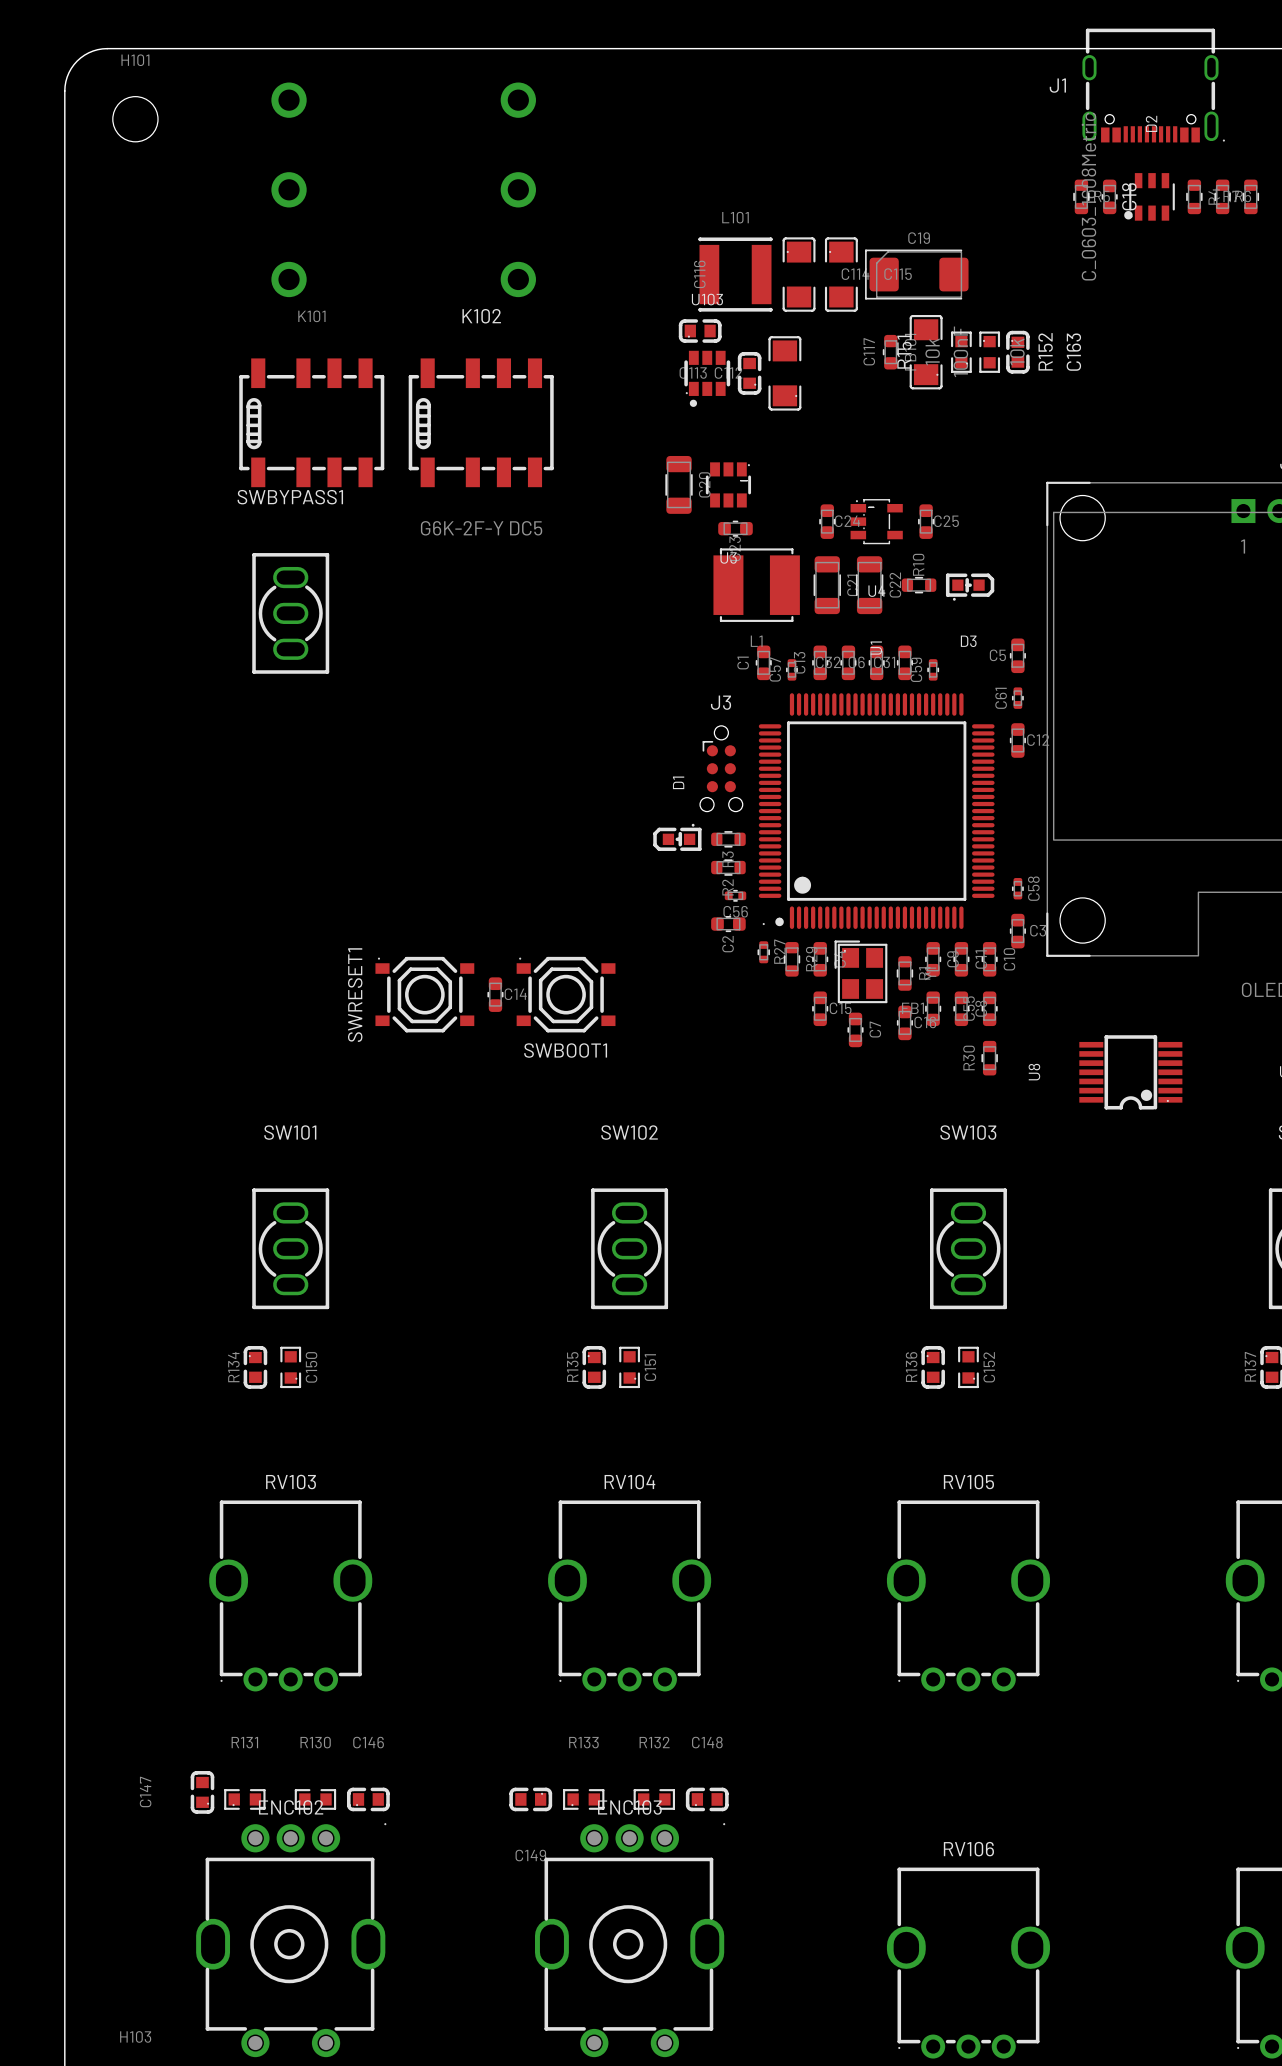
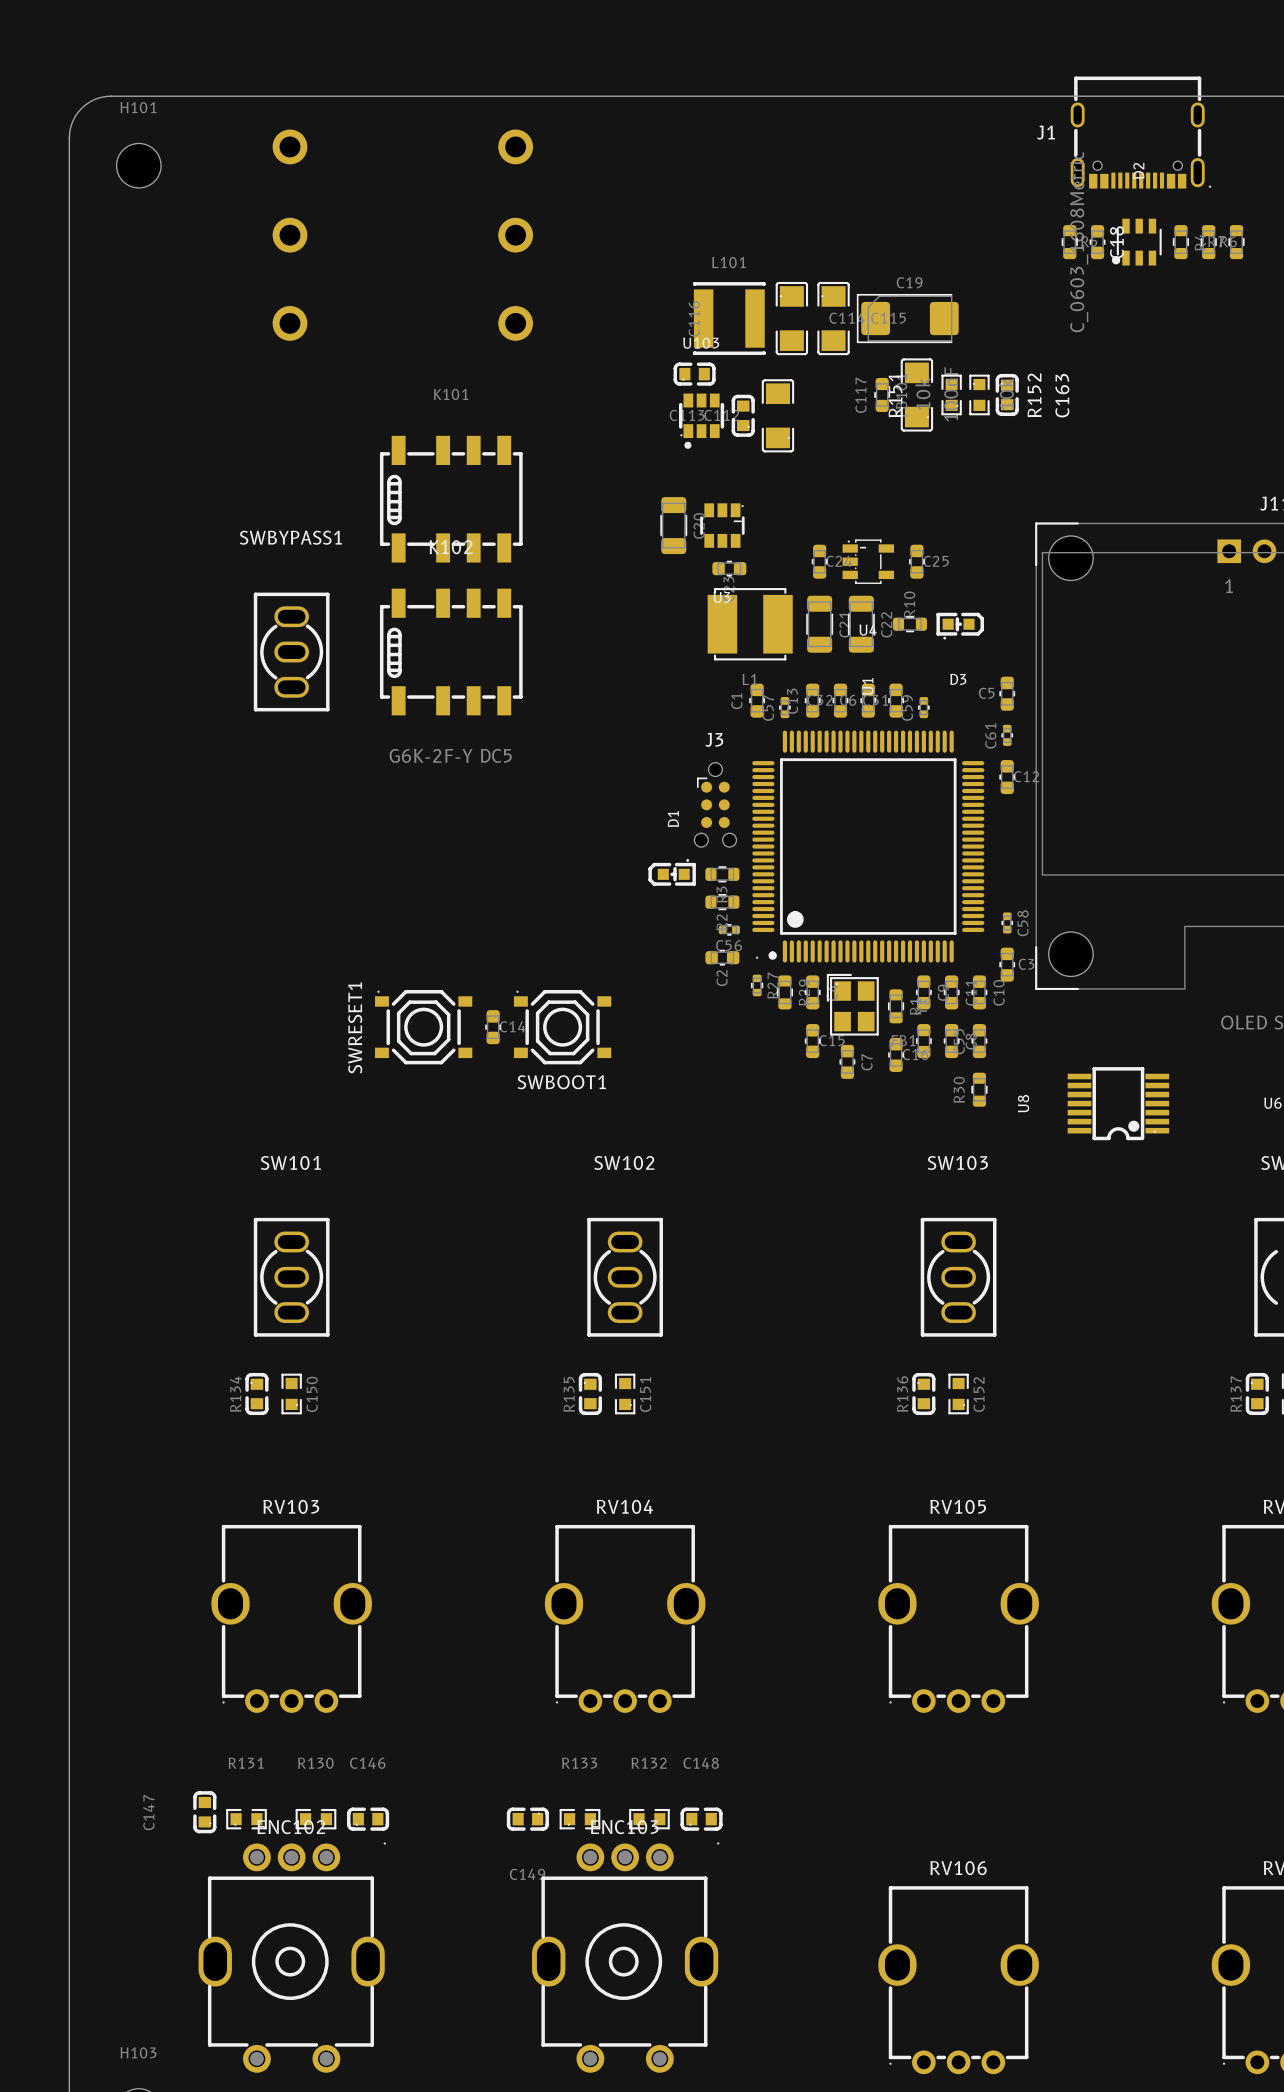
K101 position: (311, 422) -> (451, 499)
K102 position: (481, 422) -> (451, 652)

